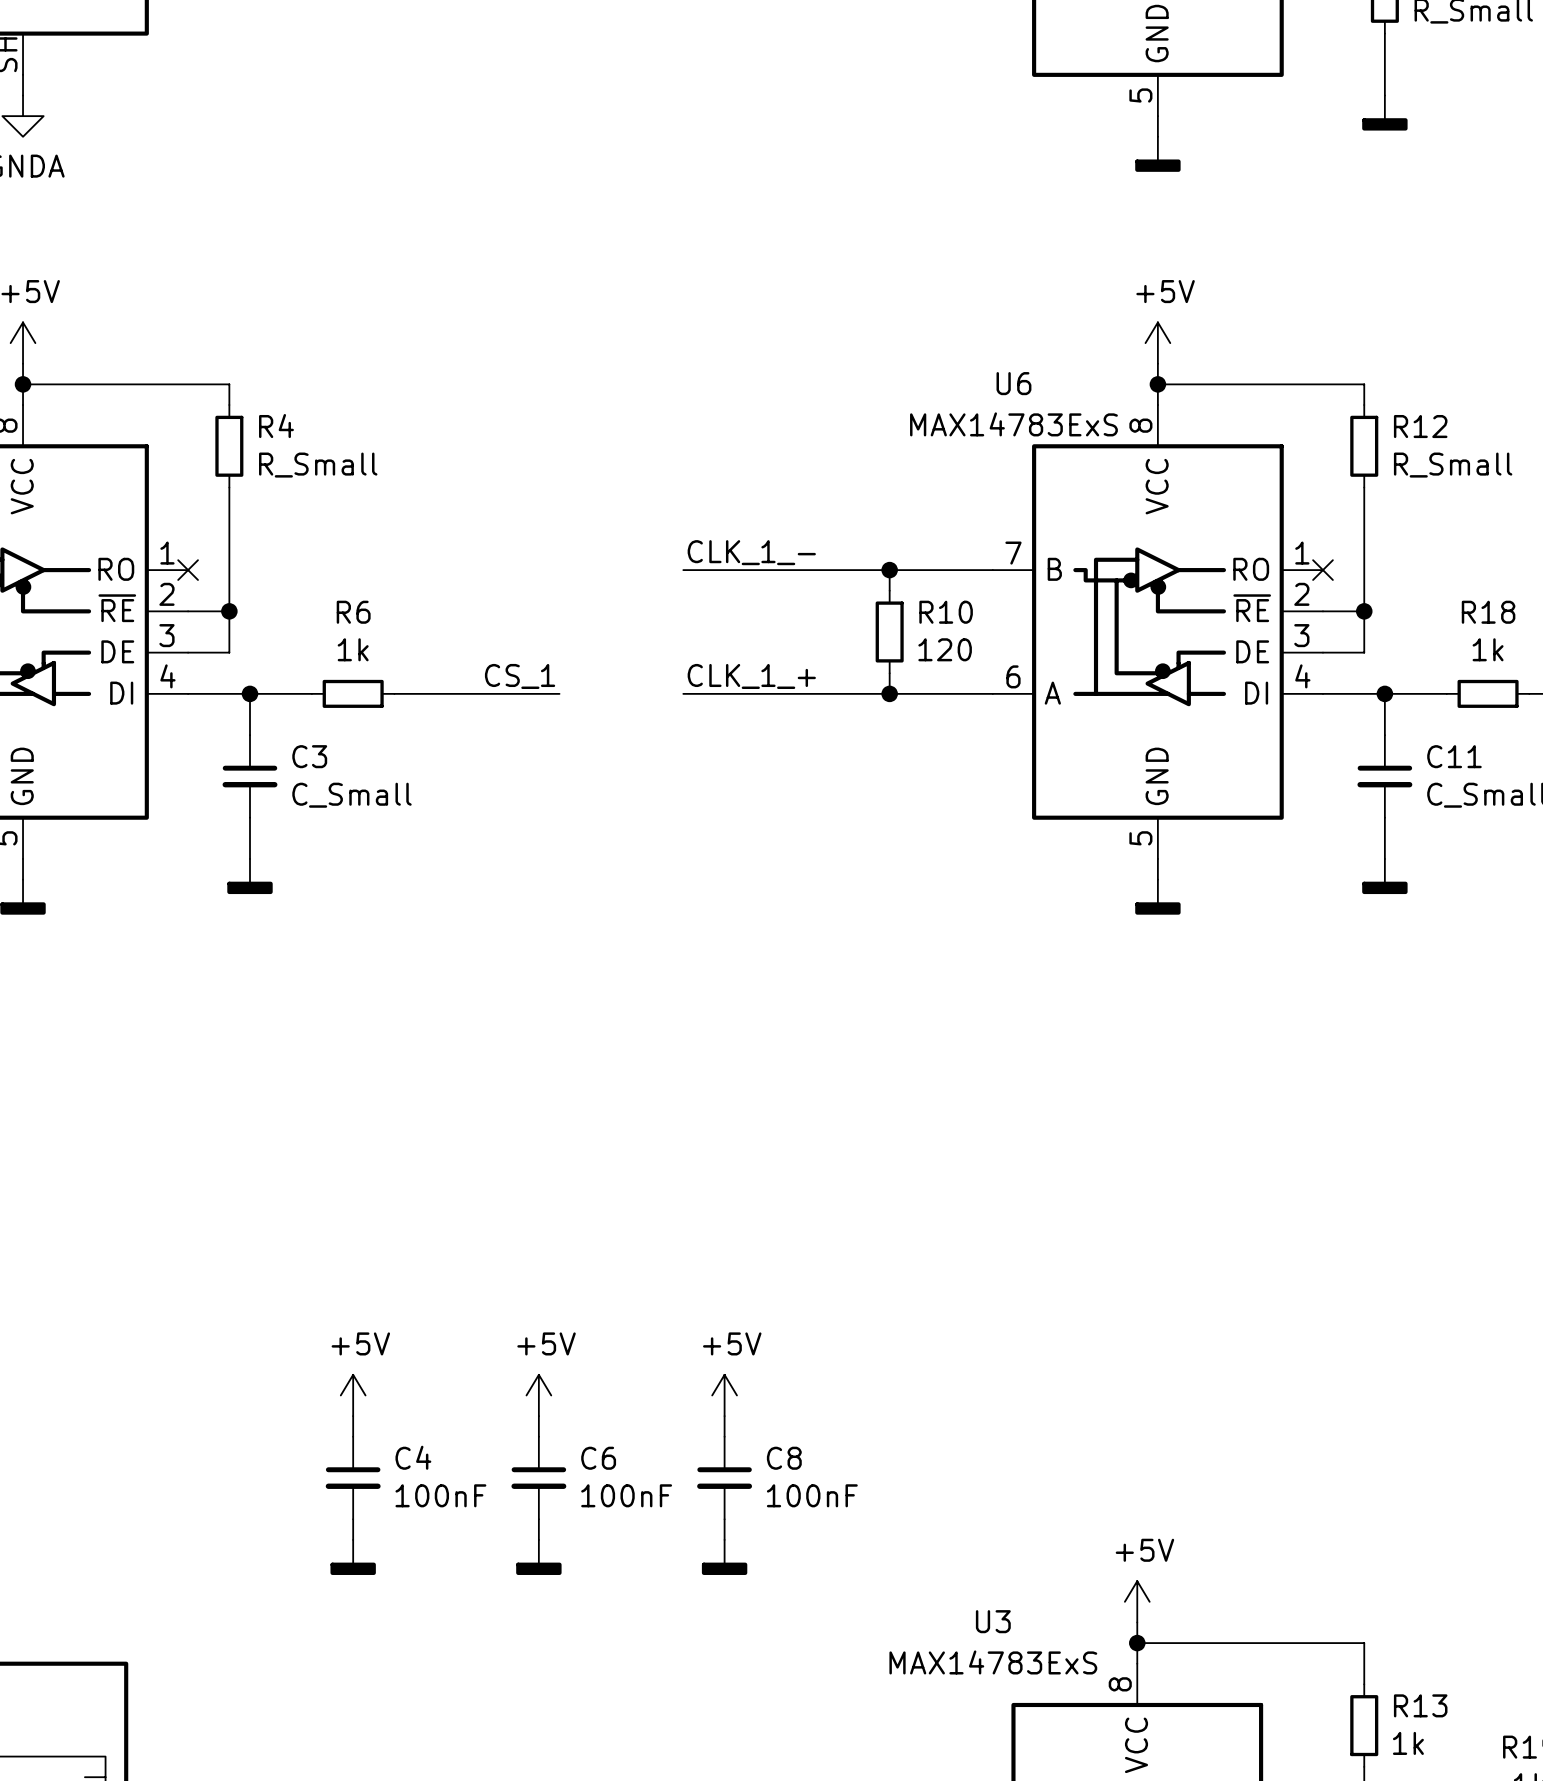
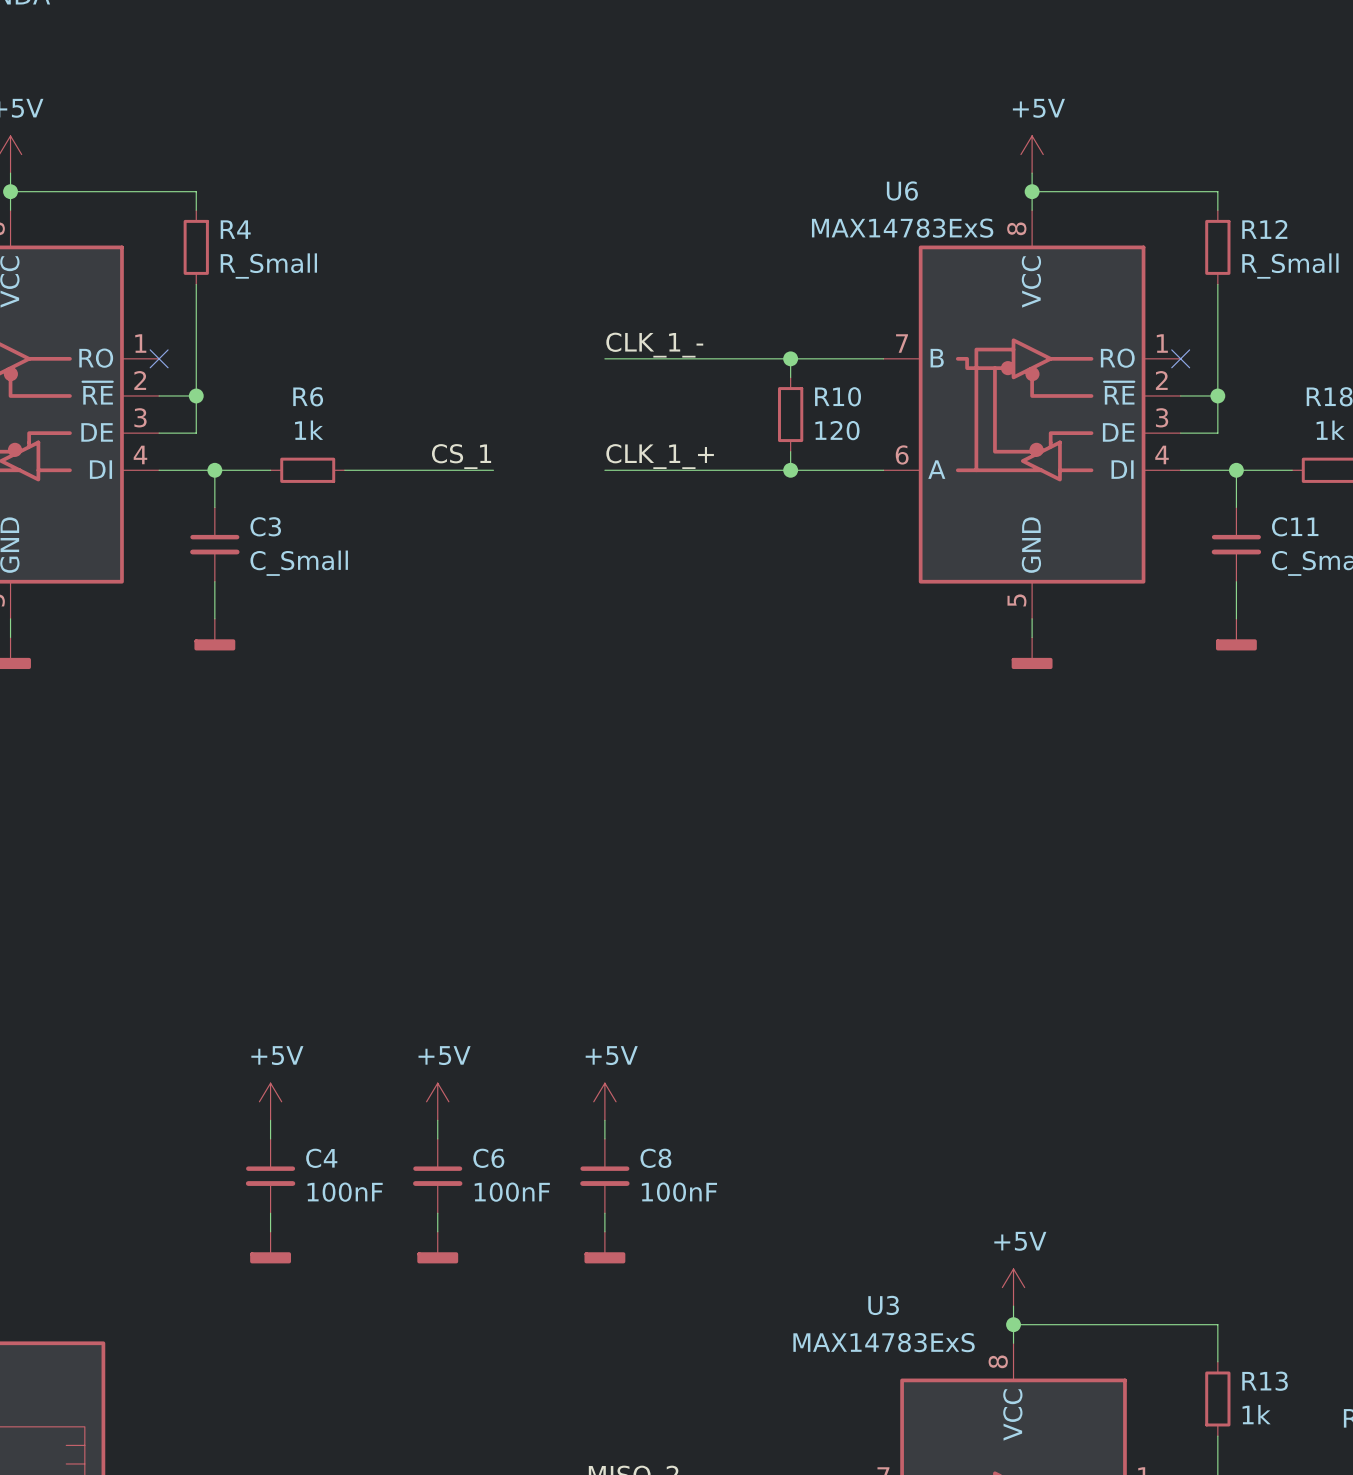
power symbol position: +5V (353, 1395) -> +5V (270, 1101)
power symbol position: +5V (538, 1395) -> +5V (437, 1101)
power symbol position: +5V (724, 1395) -> +5V (604, 1101)
wire: (353, 1416) (353, 1436) -> (270, 1120) (270, 1138)
wire: (538, 1416) (538, 1436) -> (437, 1120) (437, 1138)
wire: (724, 1416) (724, 1436) -> (604, 1120) (604, 1138)
C4 position: (353, 1478) -> (270, 1176)
C6 position: (538, 1478) -> (437, 1176)
C8 position: (724, 1478) -> (604, 1176)
wire: (353, 1519) (353, 1539) -> (270, 1213) (270, 1231)
wire: (538, 1519) (538, 1539) -> (437, 1213) (437, 1231)
wire: (724, 1519) (724, 1539) -> (604, 1213) (604, 1231)
power symbol position: (353, 1557) -> (270, 1247)
power symbol position: (538, 1557) -> (437, 1247)
power symbol position: (724, 1557) -> (604, 1247)

